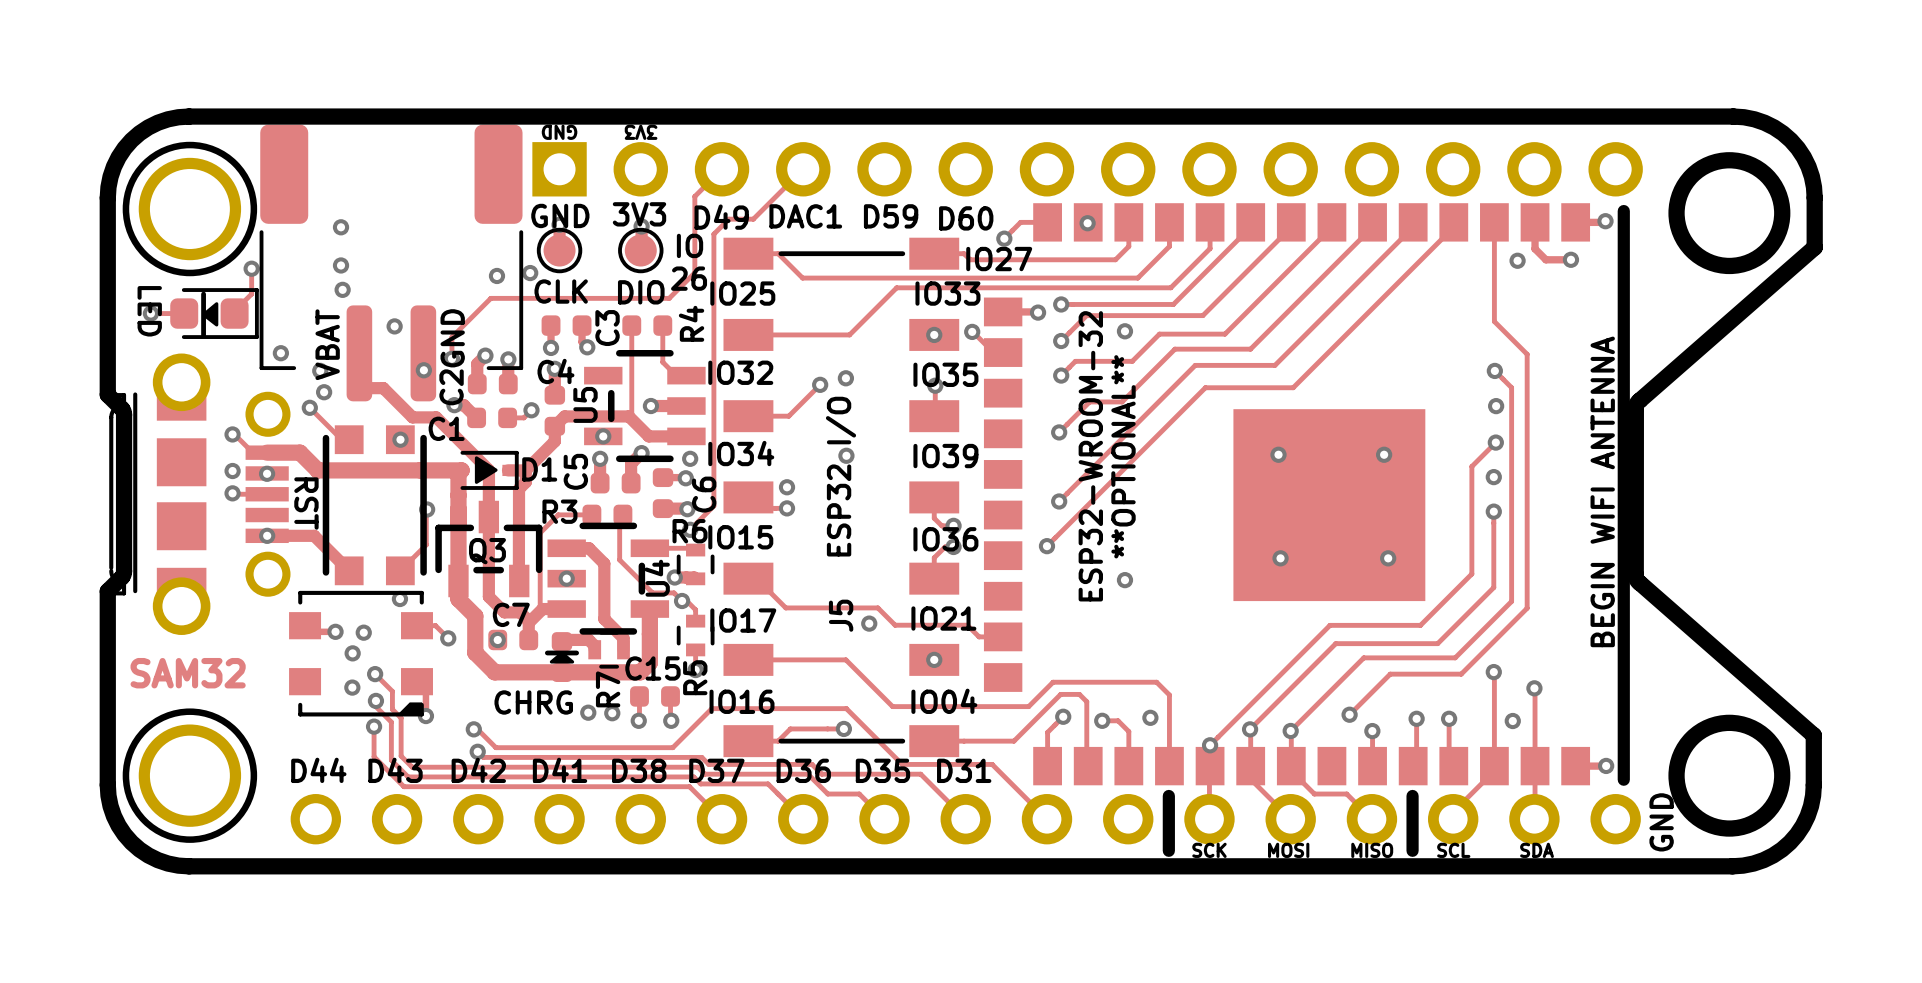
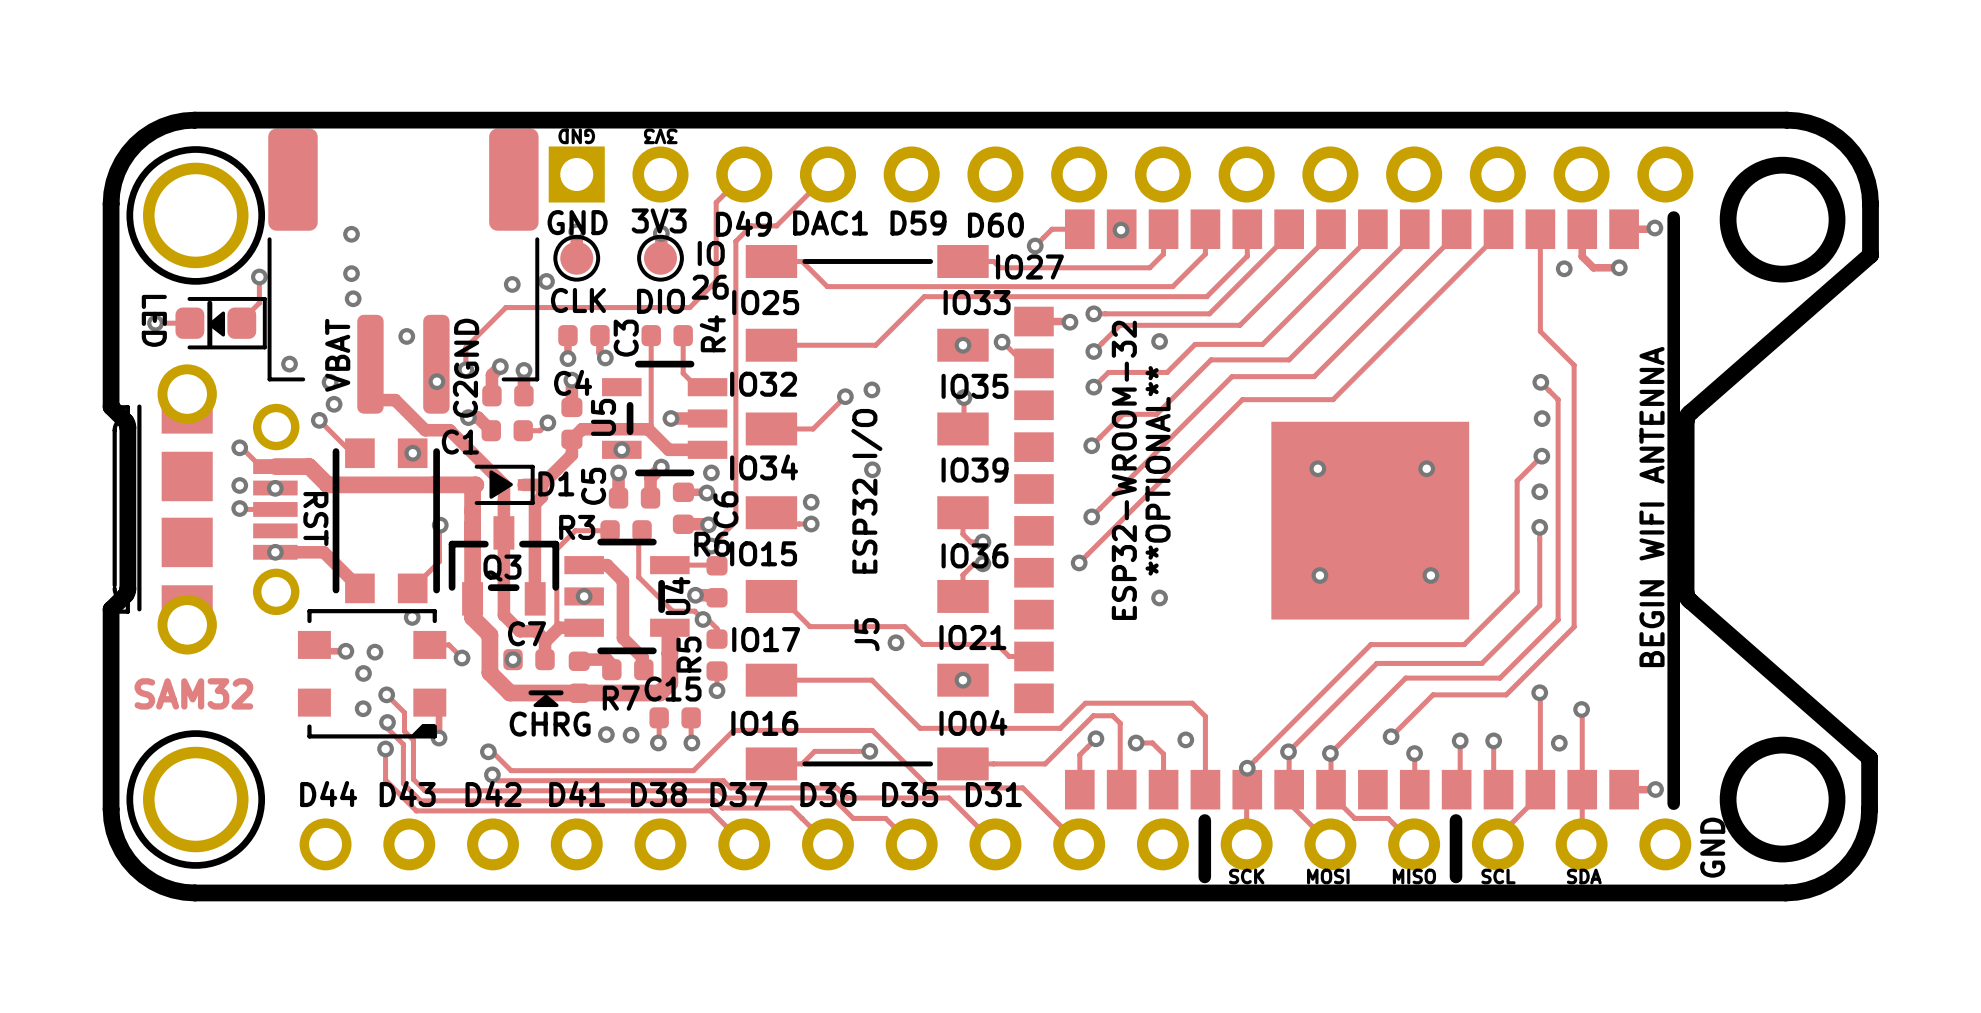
R6 footprint: [676, 543, 715, 586] -> [706, 556, 728, 608]
R5 footprint: [676, 614, 715, 657] -> [706, 629, 728, 681]
R7 footprint: [588, 630, 630, 669] -> [602, 659, 654, 681]
line: (547, 652) (576, 652) -> (530, 692) (561, 692)
drawing position: (561, 657) -> (546, 700)

